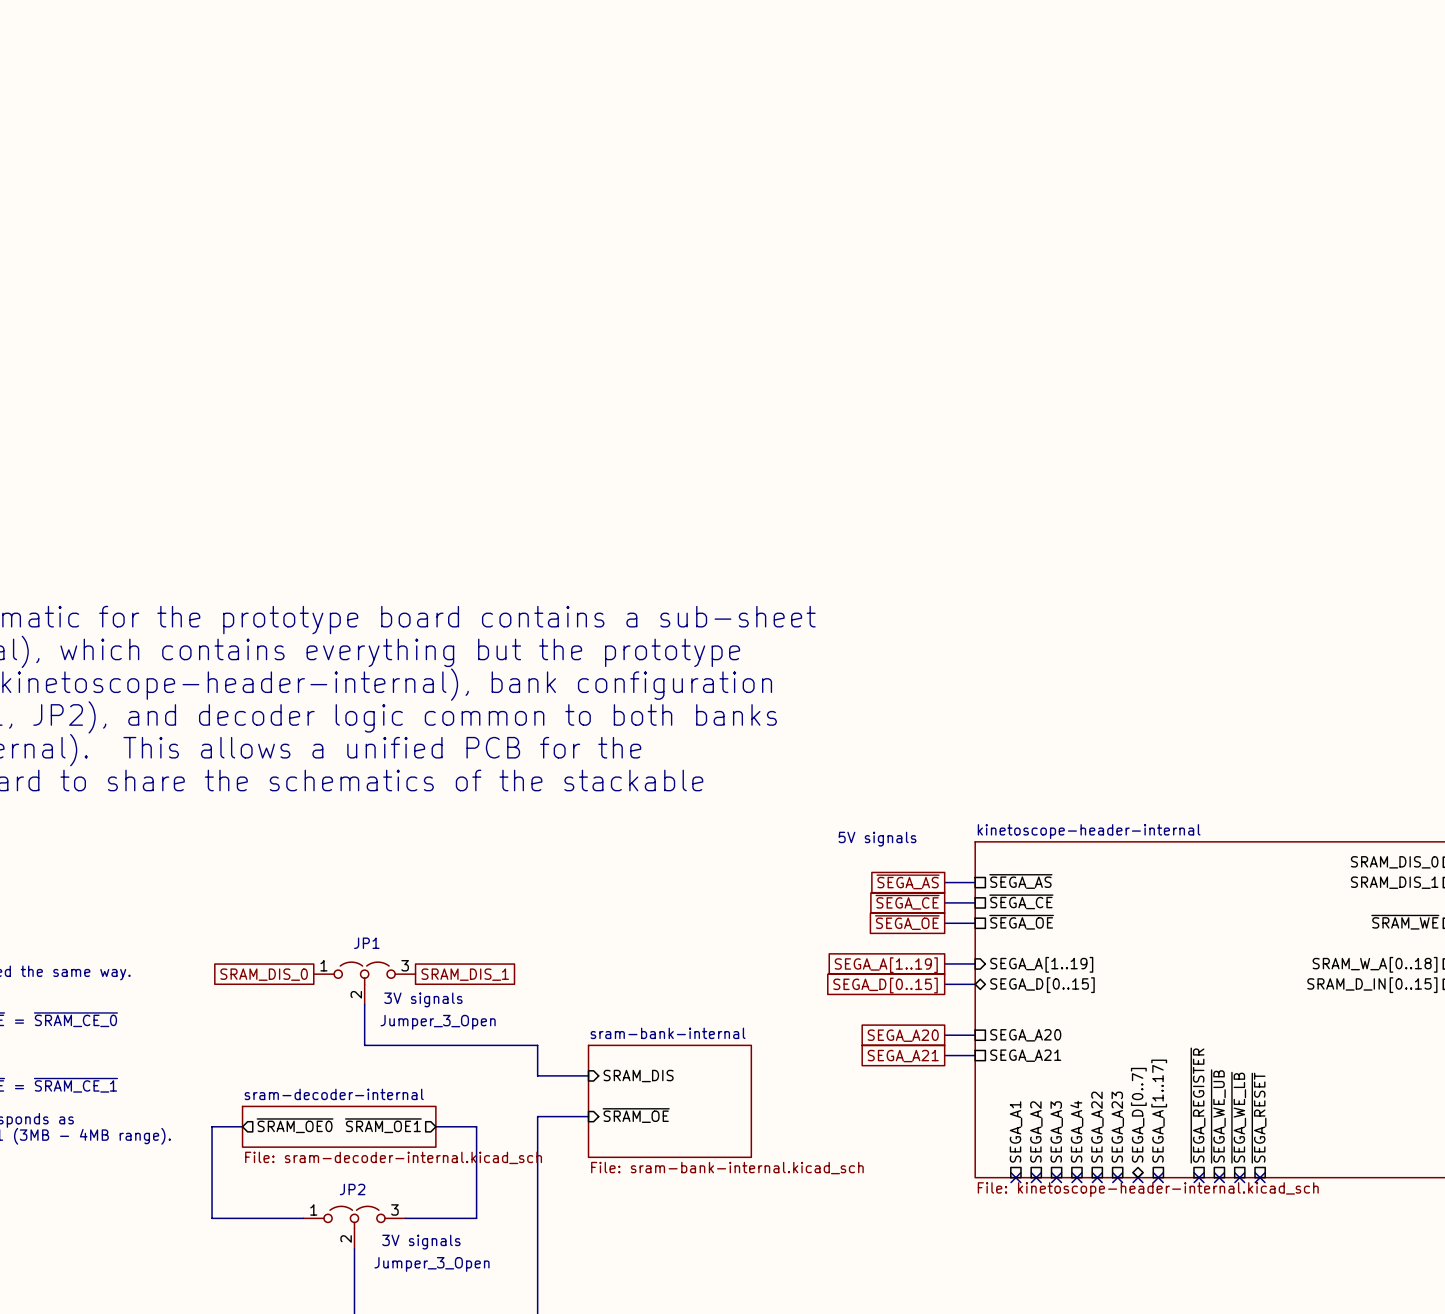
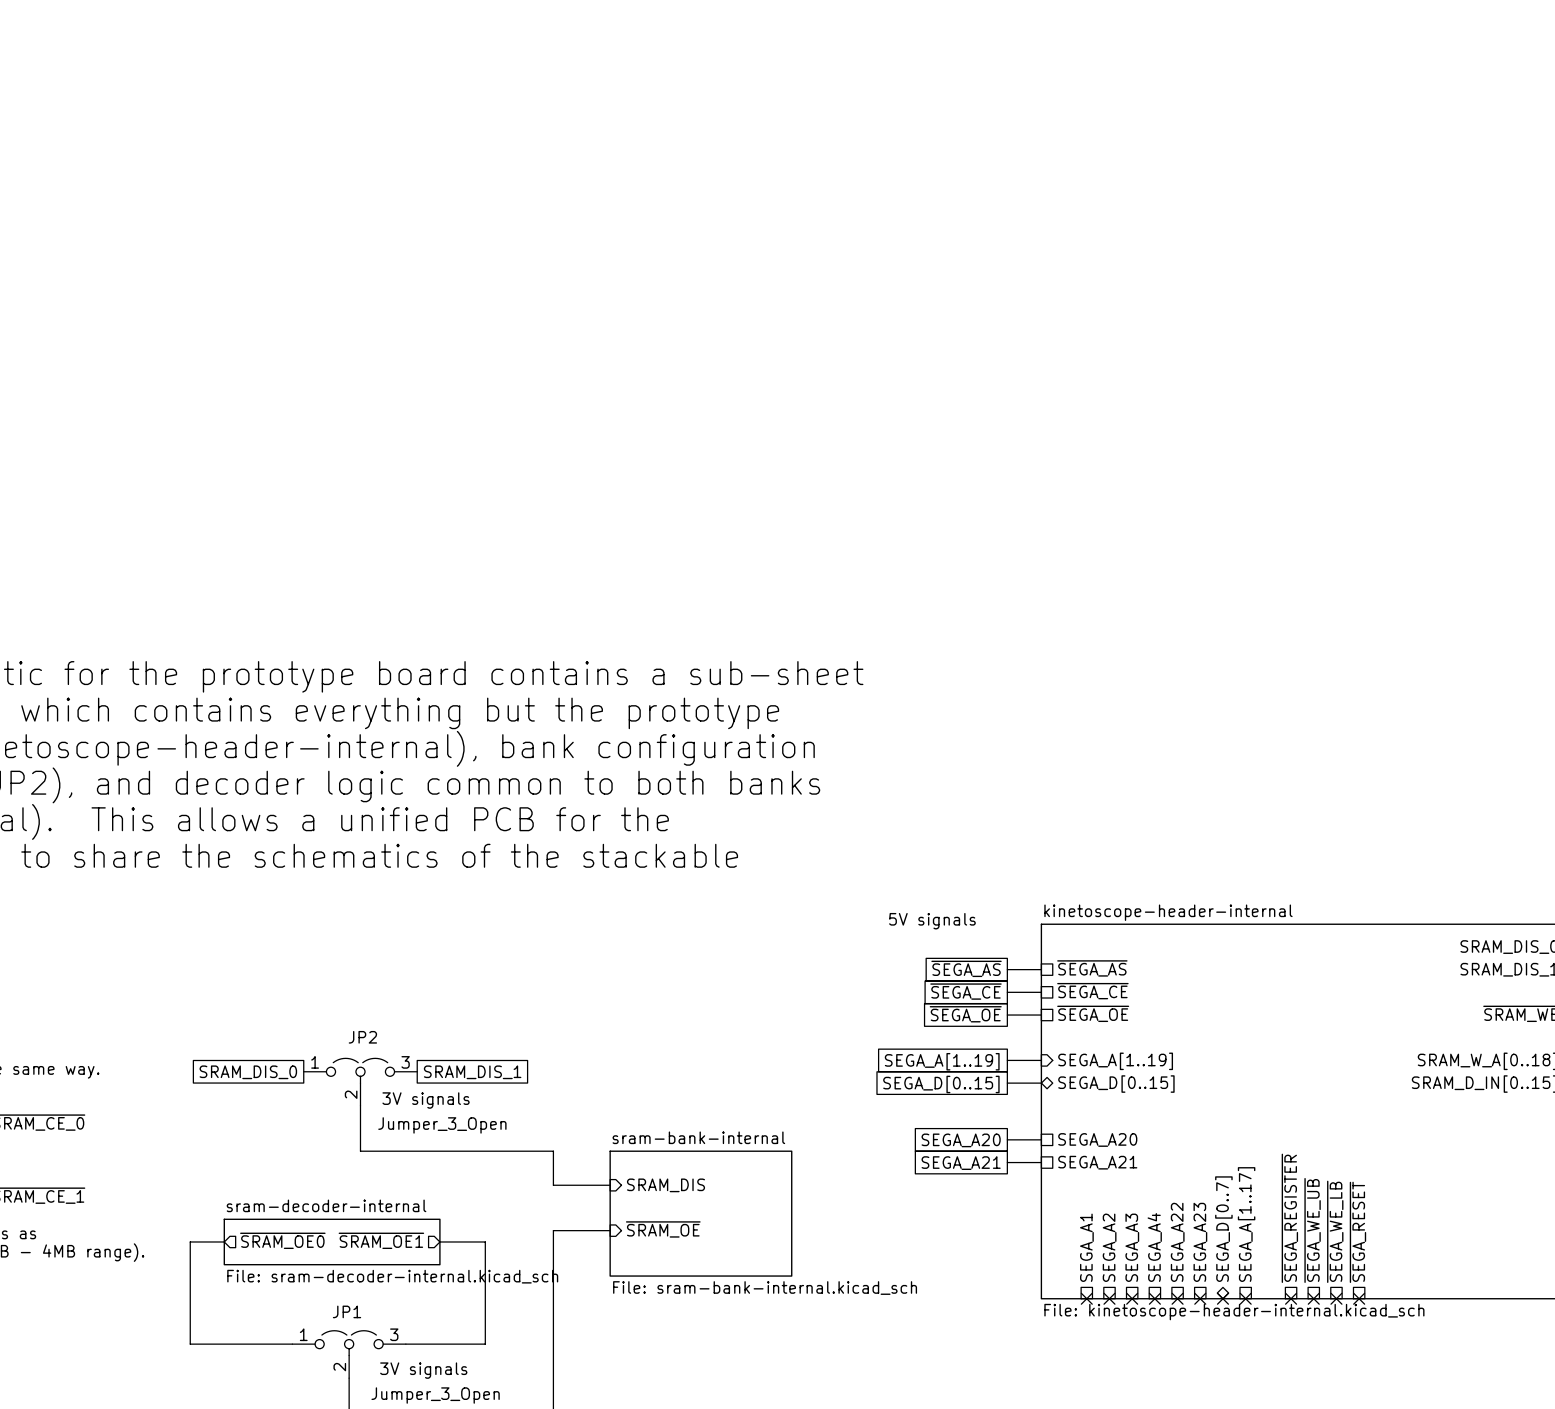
JP1 name: JP1 (366, 943) -> JP2 (362, 1037)
JP2 name: JP2 (352, 1189) -> JP1 (347, 1311)

